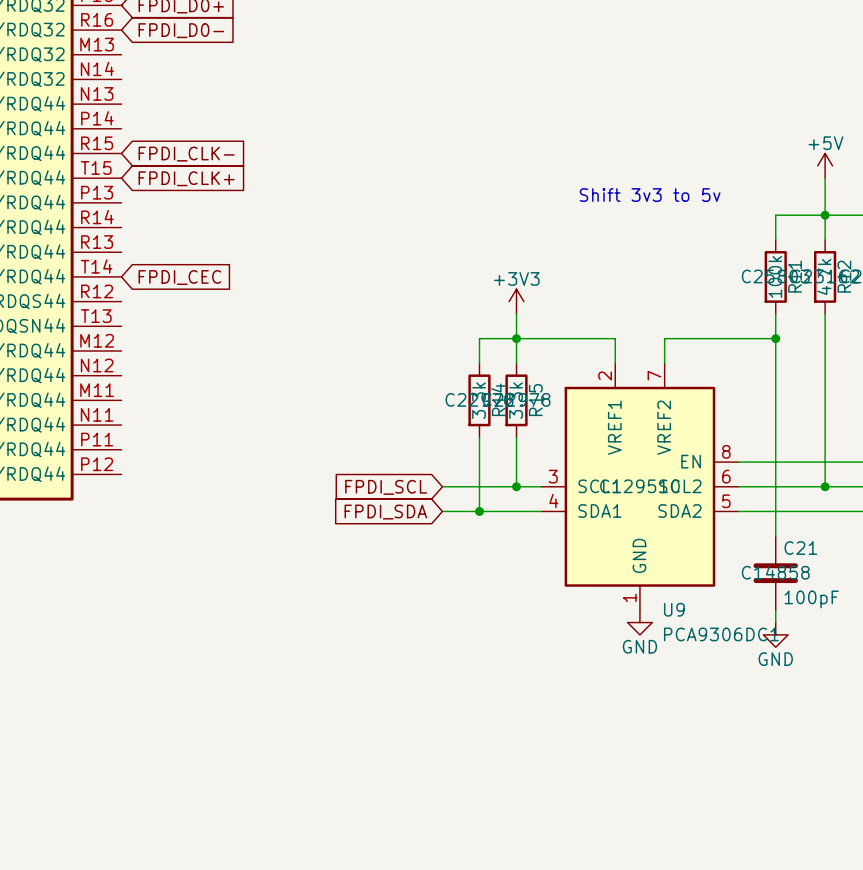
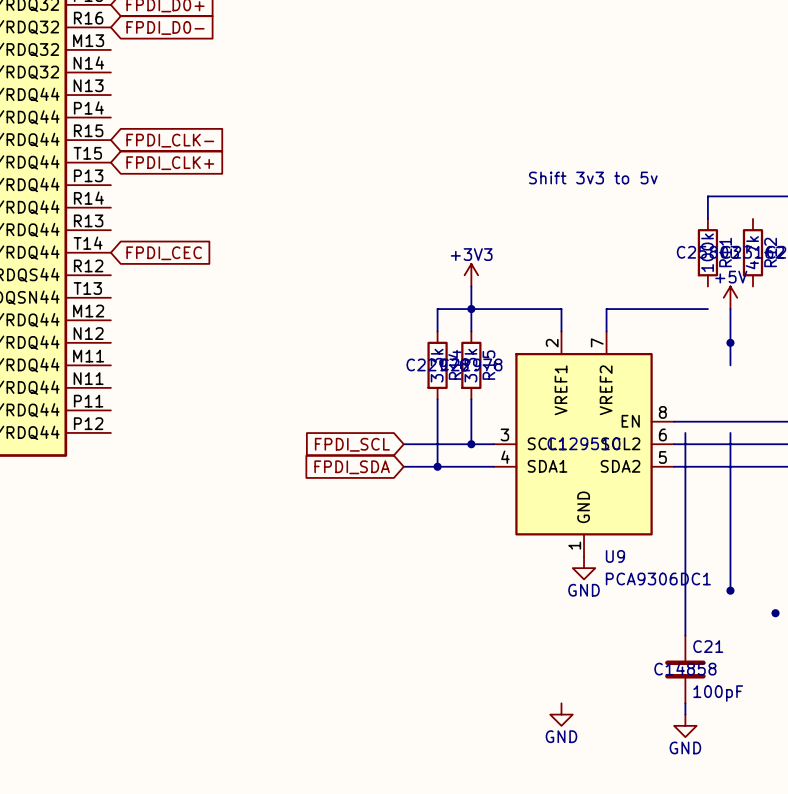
power symbol position: +5V (825, 165) -> +5V (730, 297)
wire: (825, 178) (825, 239) -> (730, 309) (730, 365)
junction: (825, 215) -> none
wire: (775, 313) (775, 536) -> (685, 432) (685, 635)
wire: (825, 313) (825, 486) -> (730, 432) (730, 590)
junction position: (775, 338) -> (730, 342)
junction: (825, 486) -> none
C21 position: (775, 573) -> (685, 669)
wire: (775, 610) (775, 622) -> (685, 703) (685, 714)
power symbol: GND (775, 634) -> none
junction: none -> (730, 590)
junction: none -> (775, 613)
power symbol: none -> GND (561, 714)
power symbol: none -> GND (685, 725)

